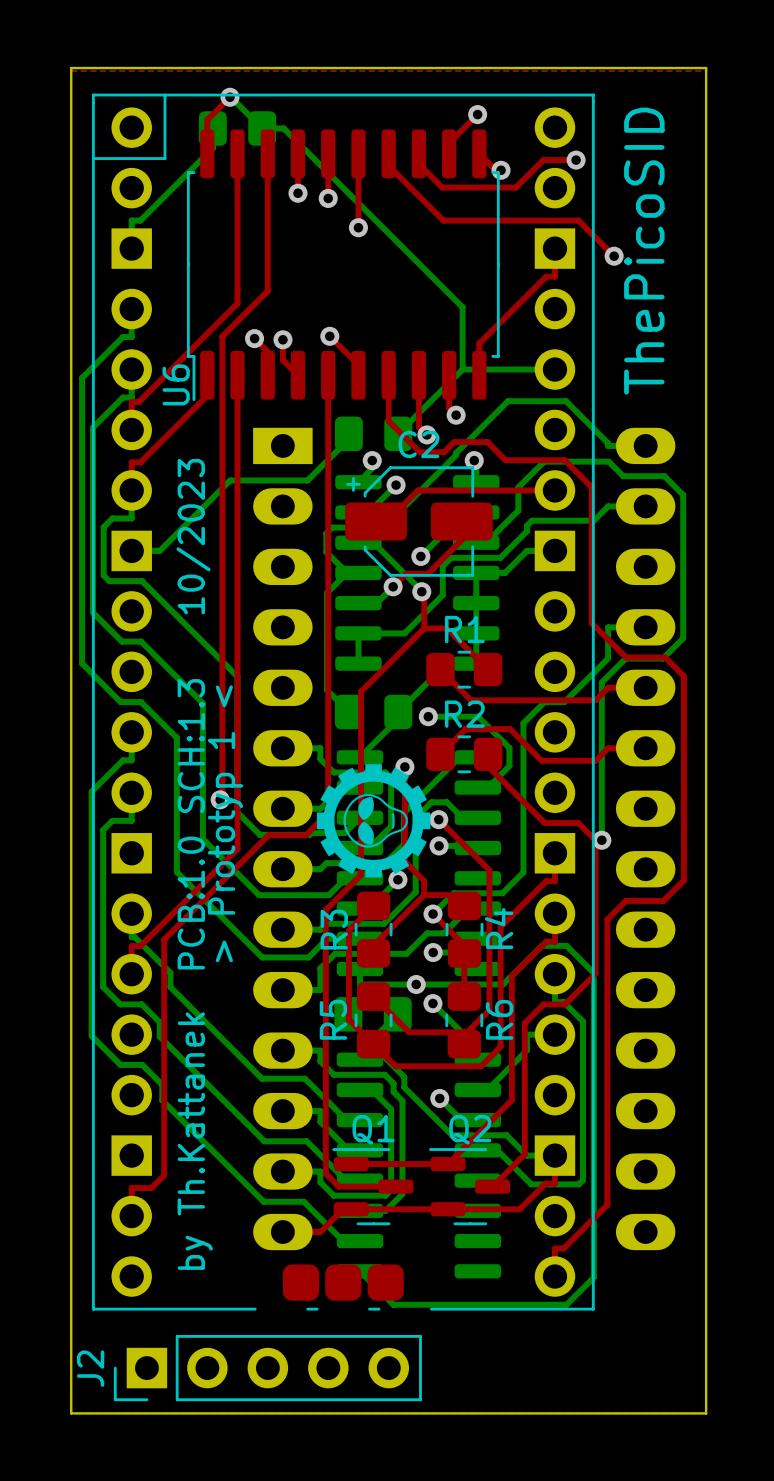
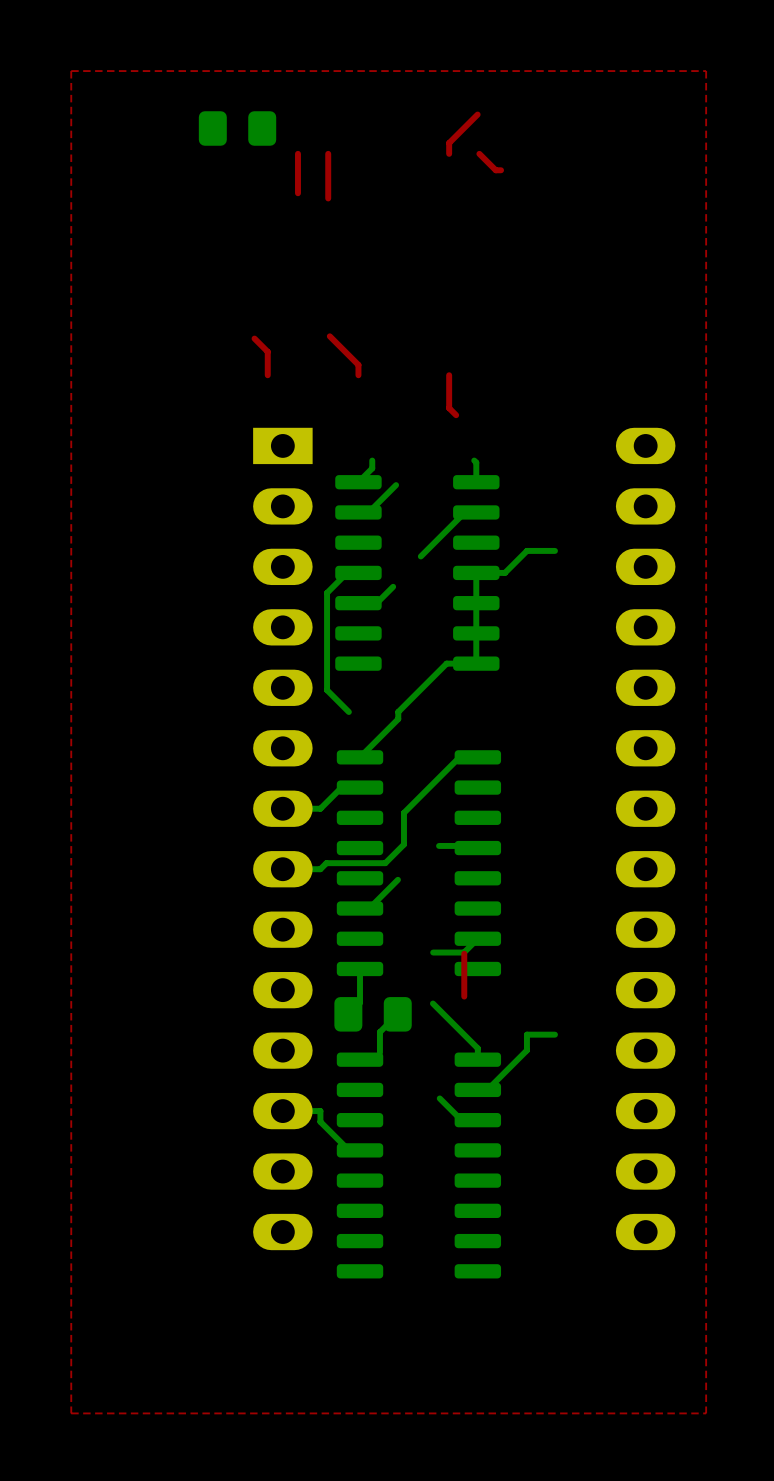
board edge: (71, 68) (706, 68) (706, 1413) (71, 1413) (71, 68) -> none
bottom track: (230, 97) (262, 128) (283, 128) (462, 307) (462, 369) -> none
top track: (230, 97) (207, 119) (207, 153) -> none
via: (230, 97) -> none
via: (477, 114) -> none
bottom track: (212, 128) (212, 148) (140, 220) (131, 220) (131, 248) -> none
top track: (237, 153) (237, 303) (139, 401) (131, 401) (131, 429) -> none
top track: (267, 153) (267, 291) (222, 336) (222, 797) (220, 799) -> none
top track: (358, 153) (358, 227) -> none
top track: (388, 153) (388, 165) (443, 220) (578, 220) (614, 256) -> none
top track: (418, 153) (418, 164) (442, 187) (515, 187) (543, 160) (576, 160) -> none
via: (576, 160) -> none
via: (501, 170) -> none
via: (297, 193) -> none
via: (328, 198) -> none
via: (358, 227) -> none
top track: (554, 248) (554, 276) (546, 276) (479, 343) (479, 375) -> none
text: ThePicoSID (644, 251) -> none
via: (614, 256) -> none
U6: (343, 265) -> none
bottom track: (131, 309) (131, 337) (123, 337) (82, 377) (82, 663) (120, 702) (141, 702) (176, 737) (176, 872) (262, 957) (308, 957) (327, 938) (360, 938) -> none
via: (329, 336) -> none
via: (254, 338) -> none
top track: (282, 339) (282, 360) (297, 375) -> none
via: (282, 339) -> none
bottom track: (131, 369) (131, 397) (123, 397) (92, 427) (92, 612) (121, 641) (141, 641) (202, 703) (202, 838) (259, 895) (328, 895) (345, 878) (360, 878) -> none
bottom track: (462, 369) (398, 433) -> none
bottom track: (462, 369) (554, 369) -> none
top track: (207, 375) (207, 395) (140, 462) (131, 462) (131, 490) -> none
top track: (237, 375) (237, 849) (140, 946) (131, 946) (131, 974) -> none
top track: (328, 375) (328, 812) (305, 835) (268, 835) (164, 939) (164, 1175) (151, 1188) (131, 1188) (131, 1216) -> none
top track: (388, 375) (388, 421) (419, 452) (444, 452) (454, 442) (487, 442) (505, 460) (564, 460) (591, 487) (591, 623) (626, 657) (665, 657) (683, 676) (683, 880) (663, 900) (626, 900) (607, 919) (607, 1204) (563, 1248) (554, 1248) (554, 1276) -> none
top track: (418, 375) (418, 426) (426, 434) -> none
via: (456, 415) -> none
bottom track: (348, 433) (348, 439) (307, 480) (230, 480) (159, 550) (131, 550) -> none
part: (373, 433) -> none
via: (426, 434) -> none
bottom track: (645, 445) (608, 445) (608, 443) (566, 401) (508, 401) (383, 527) (332, 527) (326, 533) (326, 552) (347, 572) (358, 572) -> none
via: (372, 460) -> none
via: (474, 460) -> none
via: (396, 485) -> none
bottom track: (131, 490) (131, 518) (112, 518) (103, 527) (103, 575) (109, 581) (142, 581) (237, 676) (237, 812) (259, 834) (344, 833) (360, 817) -> none
top track: (554, 490) (417, 490) (386, 521) (376, 521) -> none
bottom track: (645, 506) (608, 506) (593, 520) (532, 520) (526, 525) (526, 531) (500, 557) (451, 557) (442, 566) (442, 595) (404, 633) (358, 633) (358, 663) -> none
C2: (418, 521) -> none
top track: (461, 521) (461, 540) (428, 573) (406, 573) (393, 586) -> none
text: 10/2023 (193, 536) -> none
bottom track: (358, 542) (373, 542) (421, 591) -> none
bottom track: (476, 542) (486, 542) (518, 510) (518, 487) (544, 461) (608, 461) (623, 476) (664, 476) (683, 494) (683, 638) (663, 658) (625, 658) (601, 682) (601, 840) -> none
via: (420, 556) -> none
via: (393, 586) -> none
top track: (421, 591) (424, 594) (424, 628) -> none
via: (421, 591) -> none
bottom track: (645, 627) (608, 627) (608, 658) (564, 702) (544, 702) (523, 723) (523, 872) (502, 893) (453, 893) (433, 914) -> none
top track: (424, 628) (361, 691) (361, 874) (325, 909) (325, 1173) (338, 1186) (395, 1186) -> none
top track: (424, 628) (446, 628) (488, 669) -> none
top track: (440, 669) (471, 700) (595, 700) (608, 687) (645, 687) -> none
R1: (464, 669) -> none
part: (343, 702) -> none
part: (373, 712) -> none
bottom track: (428, 716) (478, 716) (509, 748) (509, 766) (487, 787) (477, 787) -> none
via: (428, 716) -> none
bottom track: (131, 732) (131, 760) (123, 760) (91, 791) (91, 1035) (120, 1064) (142, 1064) (162, 1084) (162, 1100) (263, 1201) (303, 1201) (343, 1241) (360, 1241) -> none
bottom track: (282, 748) (320, 748) (320, 759) (333, 772) (385, 772) (391, 778) (391, 826) (369, 848) (360, 848) -> none
top track: (645, 748) (608, 748) (595, 760) (541, 760) (510, 729) (465, 729) (440, 754) -> none
R2: (464, 754) -> none
top track: (488, 754) (488, 766) (544, 823) (578, 823) (595, 840) -> none
drawing: [316, 764, 431, 878] -> none
top track: (404, 766) (404, 861) (424, 880) (424, 895) -> none
via: (404, 766) -> none
bottom track: (131, 792) (131, 820) (112, 820) (103, 830) (103, 987) (120, 1004) (141, 1004) (159, 1022) (159, 1036) (264, 1141) (306, 1141) (346, 1180) (360, 1180) -> none
via: (220, 799) -> none
bottom track: (477, 817) (462, 817) (446, 802) (431, 802) (415, 818) (415, 892) (384, 923) (326, 923) (320, 929) (282, 929) -> none
top track: (438, 819) (489, 870) (489, 1010) (467, 1032) (409, 1032) (373, 996) -> none
via: (438, 819) -> none
text: > Prototyp 1 < (225, 823) -> none
top track: (595, 840) (595, 973) (565, 1004) (543, 1004) (524, 1023) (524, 1154) (492, 1186) -> none
via: (601, 840) -> none
via: (439, 845) -> none
top track: (554, 853) (554, 881) (546, 881) (500, 926) (500, 1046) (481, 1066) (395, 1066) (348, 1019) (348, 930) (373, 905) -> none
via: (397, 879) -> none
top track: (424, 895) (453, 895) (464, 905) -> none
top track: (424, 895) (373, 945) (373, 953) -> none
bottom track: (477, 908) (468, 908) (443, 933) (427, 933) (406, 953) (335, 953) (320, 968) (320, 990) (282, 990) -> none
bottom track: (131, 913) (131, 937) (134, 937) (170, 972) (170, 987) (261, 1078) (304, 1078) (346, 1120) (360, 1120) -> none
top track: (554, 913) (554, 941) (546, 941) (511, 976) (511, 1100) (448, 1164) (351, 1164) -> none
top track: (433, 914) (464, 945) (464, 953) -> none
via: (433, 914) -> none
R3: (373, 929) -> none
R4: (464, 929) -> none
via: (433, 952) -> none
text: by Th.Kattanek PCB:1.0 SCH:1.3 (195, 974) -> none
bottom track: (554, 974) (554, 1002) (563, 1002) (582, 1021) (582, 1180) (578, 1184) (531, 1184) (497, 1150) (477, 1150) -> none
bottom track: (360, 984) (503, 984) (541, 945) (566, 945) (593, 973) (593, 1277) (566, 1304) (393, 1304) (360, 1271) -> none
via: (416, 984) -> none
via: (432, 1003) -> none
R5: (373, 1020) -> none
R6: (464, 1020) -> none
bottom track: (282, 1050) (320, 1050) (320, 1061) (333, 1074) (384, 1074) (393, 1083) (393, 1091) (402, 1100) (402, 1194) (385, 1210) (360, 1210) -> none
bottom track: (360, 1059) (367, 1052) (379, 1052) (404, 1077) (404, 1087) (452, 1135) (506, 1135) (526, 1155) (554, 1155) -> none
bottom track: (360, 1089) (371, 1089) (391, 1109) (391, 1190) (385, 1195) (333, 1195) (320, 1182) (320, 1171) (282, 1171) -> none
via: (439, 1098) -> none
top track: (554, 1155) (554, 1183) (545, 1183) (519, 1209) (343, 1209) (320, 1232) (282, 1232) -> none
Q1: (372, 1186) -> none
Q2: (469, 1186) -> none
J2: (267, 1368) -> none

